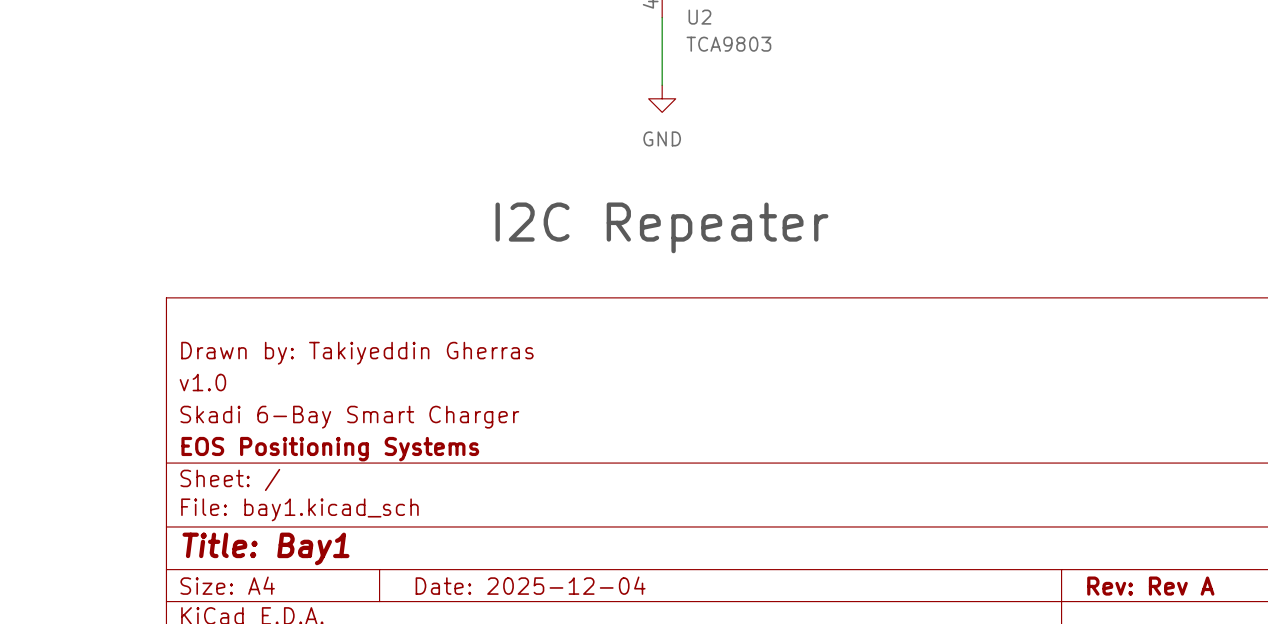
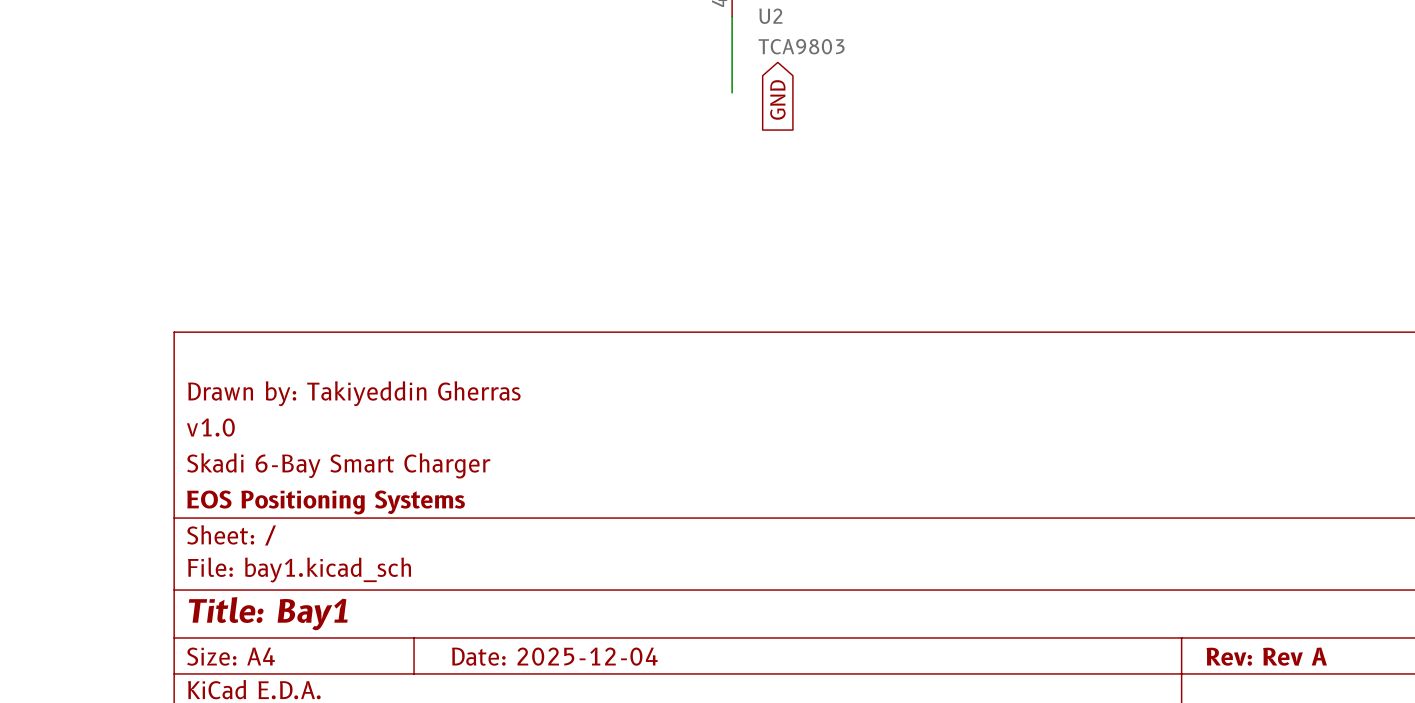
global label: none -> GND (777, 99)
power symbol: GND (662, 98) -> none
text: I2C Repeater (661, 227) -> none

